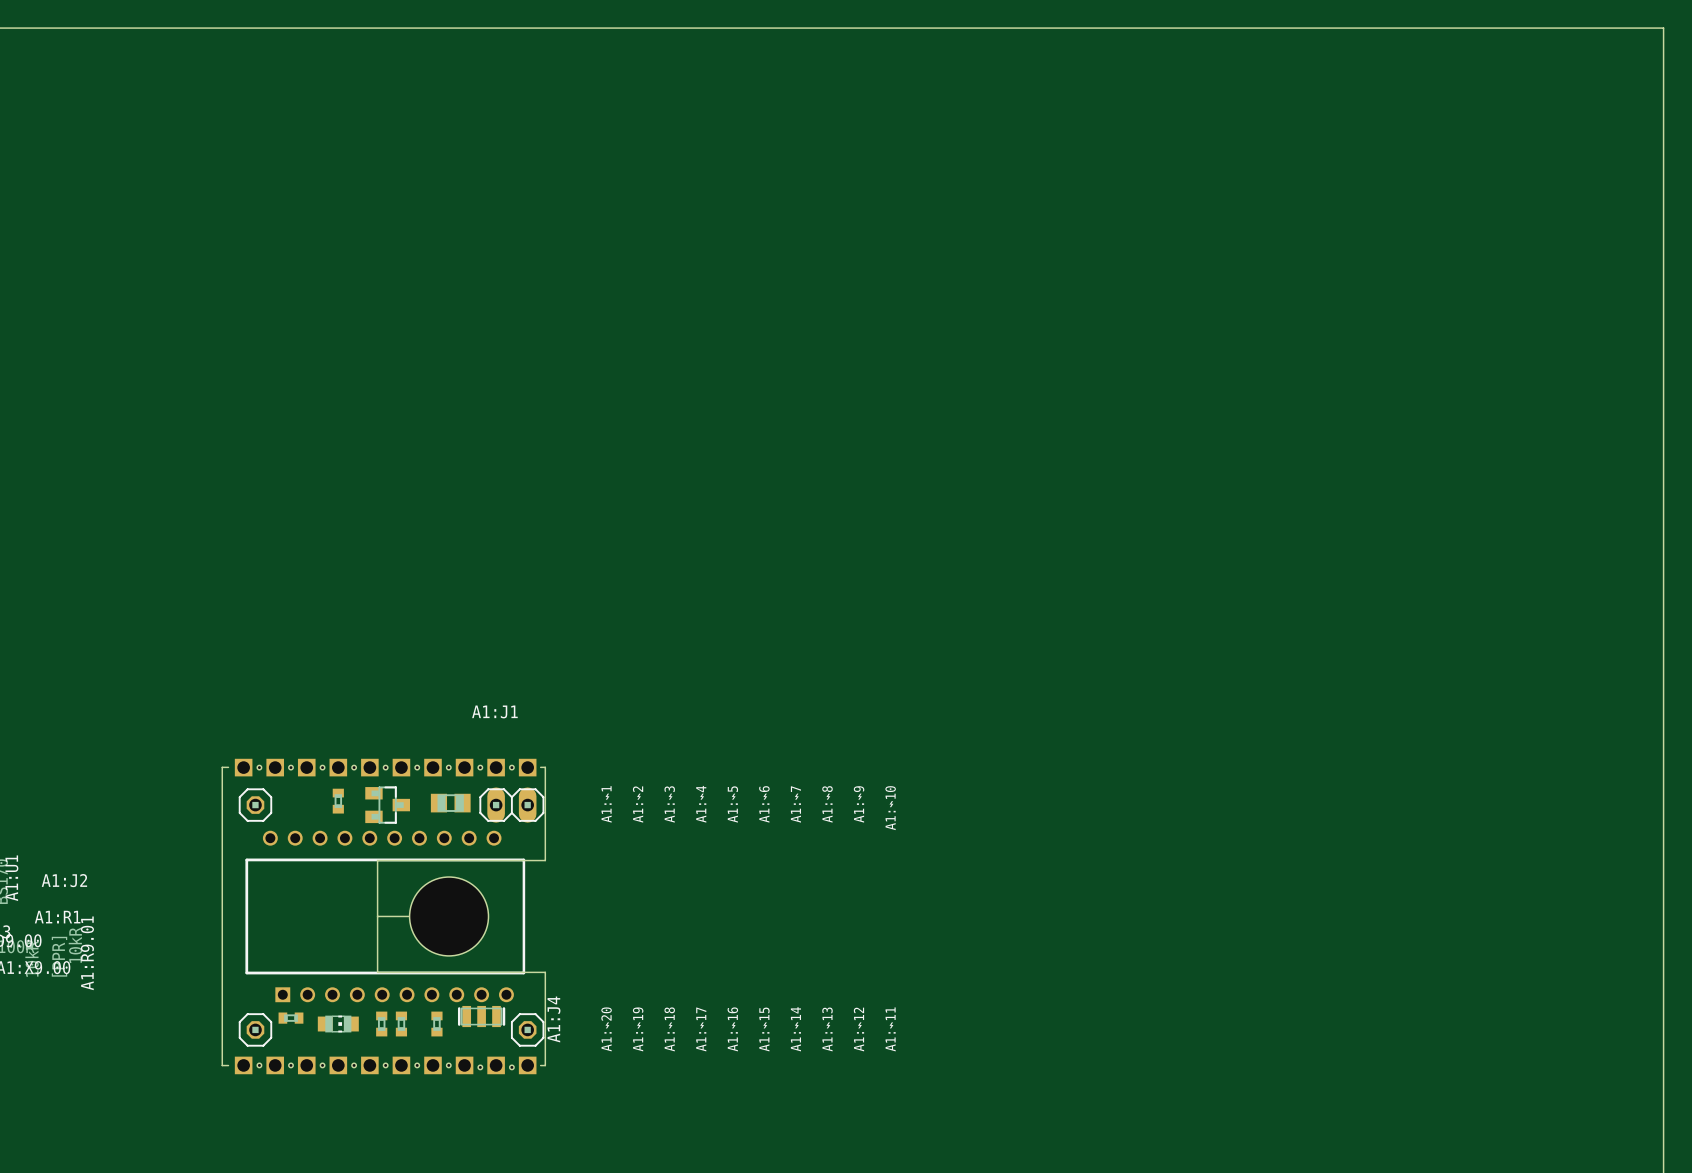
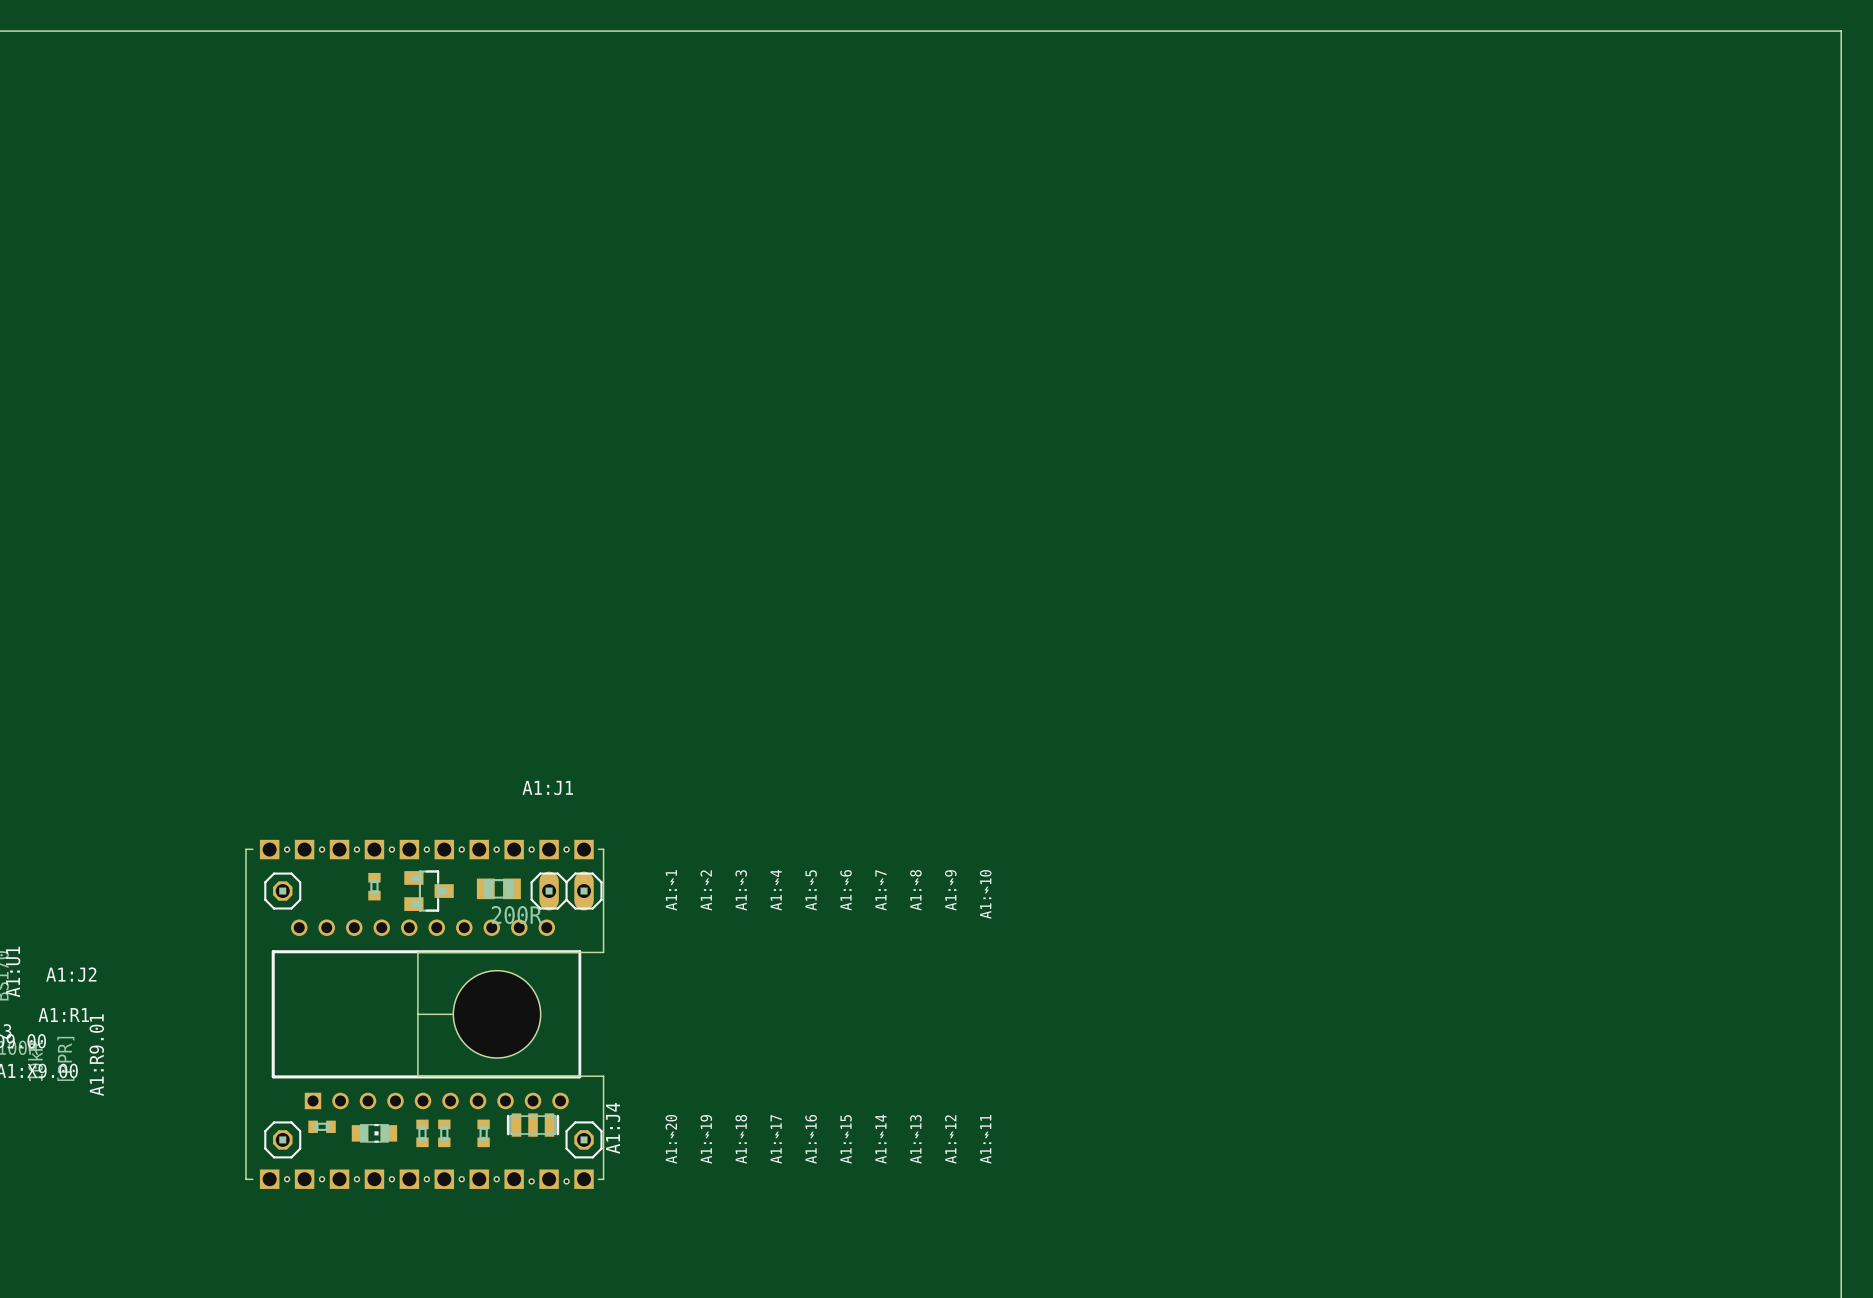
part value: none -> 200R (516, 915)
part value: 10kR (75, 945) -> none

